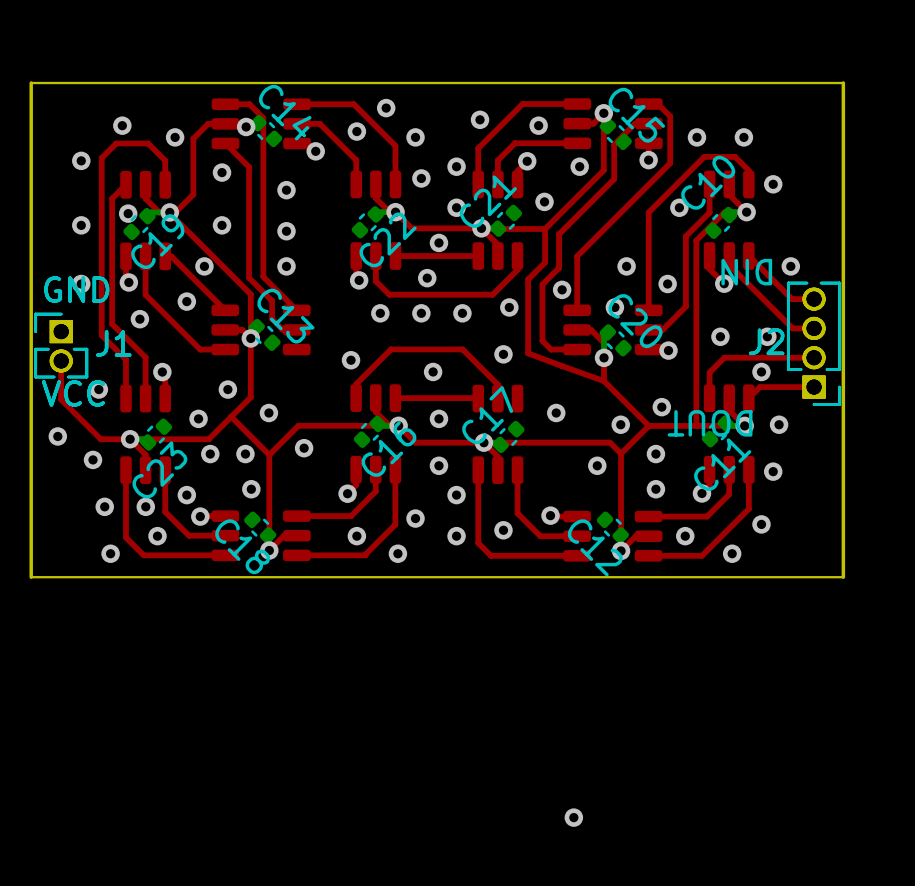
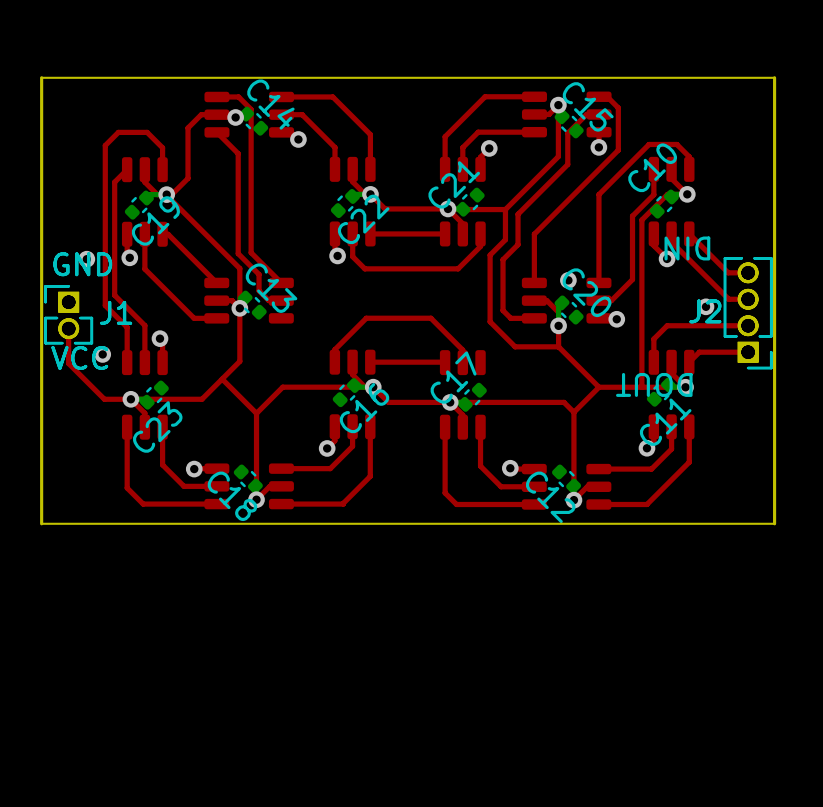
via: (386, 108) -> none
via: (480, 119) -> none
via: (122, 125) -> none
via: (538, 125) -> none
via: (356, 131) -> none
via: (175, 137) -> none
via: (415, 137) -> none
via: (696, 137) -> none
via: (743, 137) -> none
via: (81, 160) -> none
via: (456, 166) -> none
via: (579, 166) -> none
via: (222, 172) -> none
via: (421, 178) -> none
via: (773, 184) -> none
via: (286, 190) -> none
via: (544, 201) -> none
via: (456, 207) -> none
via: (679, 207) -> none
via: (128, 213) -> none
via: (81, 225) -> none
via: (222, 225) -> none
via: (286, 231) -> none
via: (438, 242) -> none
via: (204, 266) -> none
via: (286, 266) -> none
via: (626, 266) -> none
via: (790, 266) -> none
via: (427, 278) -> none
via: (667, 284) -> none
via: (562, 289) -> none
via: (186, 301) -> none
via: (509, 307) -> none
via: (380, 313) -> none
via: (421, 313) -> none
via: (462, 313) -> none
via: (139, 319) -> none
via: (720, 336) -> none
top track: (528, 353) (604, 381) -> (490, 321) (515, 346) (558, 346)
via: (503, 354) -> none
via: (351, 360) -> none
via: (433, 371) -> none
via: (761, 371) -> none
via: (227, 389) -> none
via: (661, 407) -> none
via: (268, 413) -> none
via: (556, 413) -> none
via: (198, 418) -> none
via: (438, 418) -> none
via: (620, 424) -> none
via: (779, 424) -> none
via: (57, 436) -> none
via: (304, 448) -> none
via: (210, 454) -> none
via: (245, 454) -> none
via: (655, 454) -> none
via: (93, 459) -> none
via: (438, 465) -> none
via: (597, 465) -> none
via: (773, 471) -> none
via: (251, 489) -> none
via: (655, 489) -> none
via: (186, 495) -> none
via: (456, 495) -> none
via: (104, 506) -> none
via: (145, 506) -> none
via: (415, 518) -> none
via: (761, 524) -> none
via: (503, 530) -> none
via: (157, 536) -> none
via: (356, 536) -> none
via: (456, 536) -> none
via: (685, 536) -> none
via: (110, 553) -> none
via: (397, 553) -> none
via: (732, 553) -> none
via: (573, 817) -> none

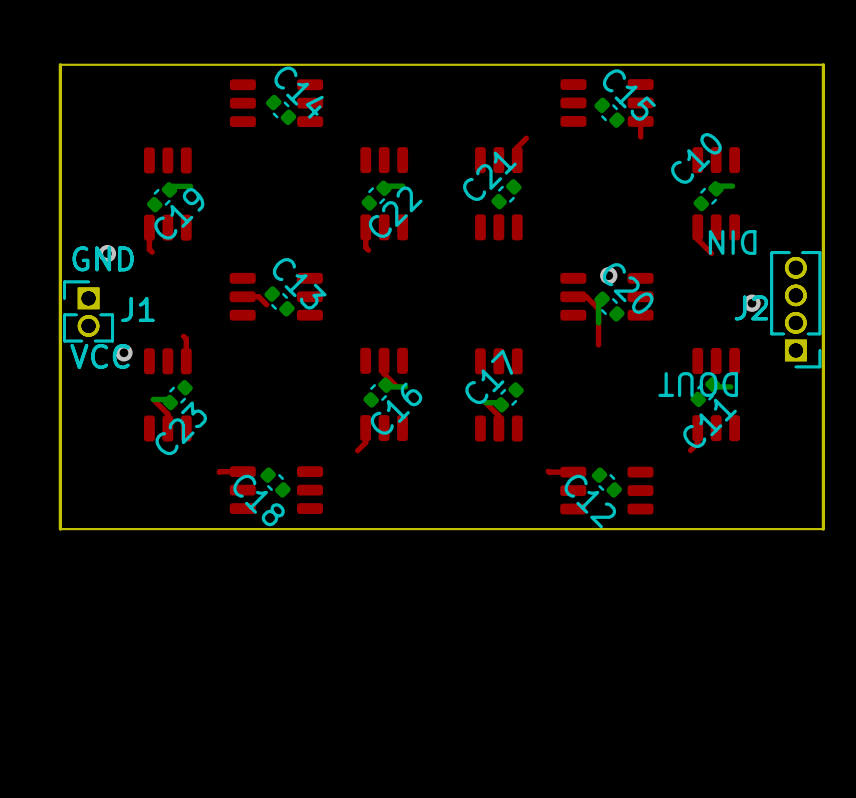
top track: (216, 96) (238, 96) (251, 109) (251, 252) (281, 282) -> none
top track: (281, 96) (332, 96) (370, 134) (370, 169) -> none
top track: (534, 96) (485, 96) (445, 136) (445, 169) -> none
top track: (599, 96) (607, 96) (618, 107) (618, 150) (534, 234) (534, 282) -> none
via: (558, 105) -> none
top track: (281, 114) (302, 114) (334, 147) (334, 169) -> none
top track: (534, 114) (549, 114) (558, 105) (558, 156) (505, 209) -> none
top track: (599, 114) (586, 114) (567, 133) (567, 164) (518, 214) (518, 244) (503, 259) (503, 310) (510, 318) (534, 318) -> none
top track: (235, 117) (232, 114) (201, 114) (188, 128) (188, 178) (171, 194) (157, 194) (144, 182) (144, 169) -> none
via: (235, 117) -> none
top track: (216, 132) (238, 153) (238, 253) (259, 274) (259, 290) (268, 300) (281, 300) -> none
top track: (534, 132) (478, 132) (462, 147) (462, 169) -> none
via: (298, 139) -> none
via: (598, 147) -> none
via: (489, 148) -> none
top track: (127, 169) (114, 182) (114, 295) (144, 325) (144, 362) -> none
top track: (162, 169) (162, 147) (147, 132) (118, 132) (105, 145) (105, 305) (127, 327) (127, 362) -> none
top track: (352, 169) (352, 181) (365, 194) (370, 194) (385, 208) (447, 208) (462, 223) (462, 233) -> none
top track: (653, 169) (653, 194) (632, 216) (632, 279) (611, 300) (598, 300) -> none
top track: (671, 169) (671, 178) (687, 194) (667, 194) (641, 219) (642, 387) -> none
top track: (689, 169) (689, 156) (676, 144) (649, 144) (598, 194) (598, 282) -> none
top track: (166, 194) (239, 268) (239, 361) (201, 399) (104, 399) (68, 363) (68, 328) -> none
via: (166, 194) -> none
via: (370, 194) -> none
via: (687, 194) -> none
via: (447, 208) -> none
top track: (505, 209) (505, 239) (490, 255) (490, 321) (515, 346) (558, 346) (599, 387) -> none
top track: (505, 209) (448, 209) -> none
top track: (445, 233) (370, 233) -> none
top track: (480, 233) (480, 246) (458, 268) (364, 268) (352, 256) (352, 233) -> none
top track: (671, 233) (671, 242) (728, 299) (748, 299) -> none
top track: (689, 233) (728, 272) (748, 272) -> none
top track: (144, 234) (144, 269) (194, 318) (216, 318) -> none
top track: (162, 234) (168, 234) (216, 282) -> none
via: (337, 255) -> none
via: (129, 257) -> none
via: (667, 258) -> none
via: (239, 308) -> none
via: (616, 319) -> none
via: (558, 325) -> none
top track: (748, 325) (667, 325) (653, 339) (653, 362) -> none
via: (159, 338) -> none
top track: (748, 352) (699, 352) (689, 362) -> none
top track: (334, 362) (334, 349) (366, 318) (430, 318) (462, 350) (462, 362) -> none
top track: (370, 362) (445, 362) -> none
top track: (671, 362) (671, 373) (685, 387) (599, 387) -> none
top track: (222, 379) (256, 413) -> none
via: (373, 387) -> none
top track: (599, 387) (573, 412) -> none
via: (685, 387) -> none
via: (130, 399) -> none
via: (450, 402) -> none
top track: (573, 412) (564, 402) (388, 402) (373, 387) (282, 387) (256, 413) -> none
top track: (573, 412) (573, 500) (587, 486) (598, 486) -> none
top track: (256, 413) (256, 499) (269, 486) (281, 486) -> none
top track: (352, 426) (352, 446) (330, 468) (281, 468) -> none
top track: (370, 426) (370, 476) (343, 504) (281, 504) -> none
top track: (671, 426) (671, 449) (651, 469) (598, 469) -> none
top track: (689, 426) (689, 462) (646, 504) (598, 504) -> none
top track: (127, 427) (127, 488) (143, 504) (216, 504) -> none
top track: (162, 427) (162, 464) (184, 486) (216, 486) -> none
top track: (445, 427) (445, 493) (456, 504) (534, 504) -> none
top track: (480, 427) (480, 466) (501, 486) (534, 486) -> none
via: (327, 448) -> none
via: (646, 448) -> none
via: (510, 468) -> none
via: (194, 469) -> none
via: (256, 499) -> none
via: (573, 500) -> none

